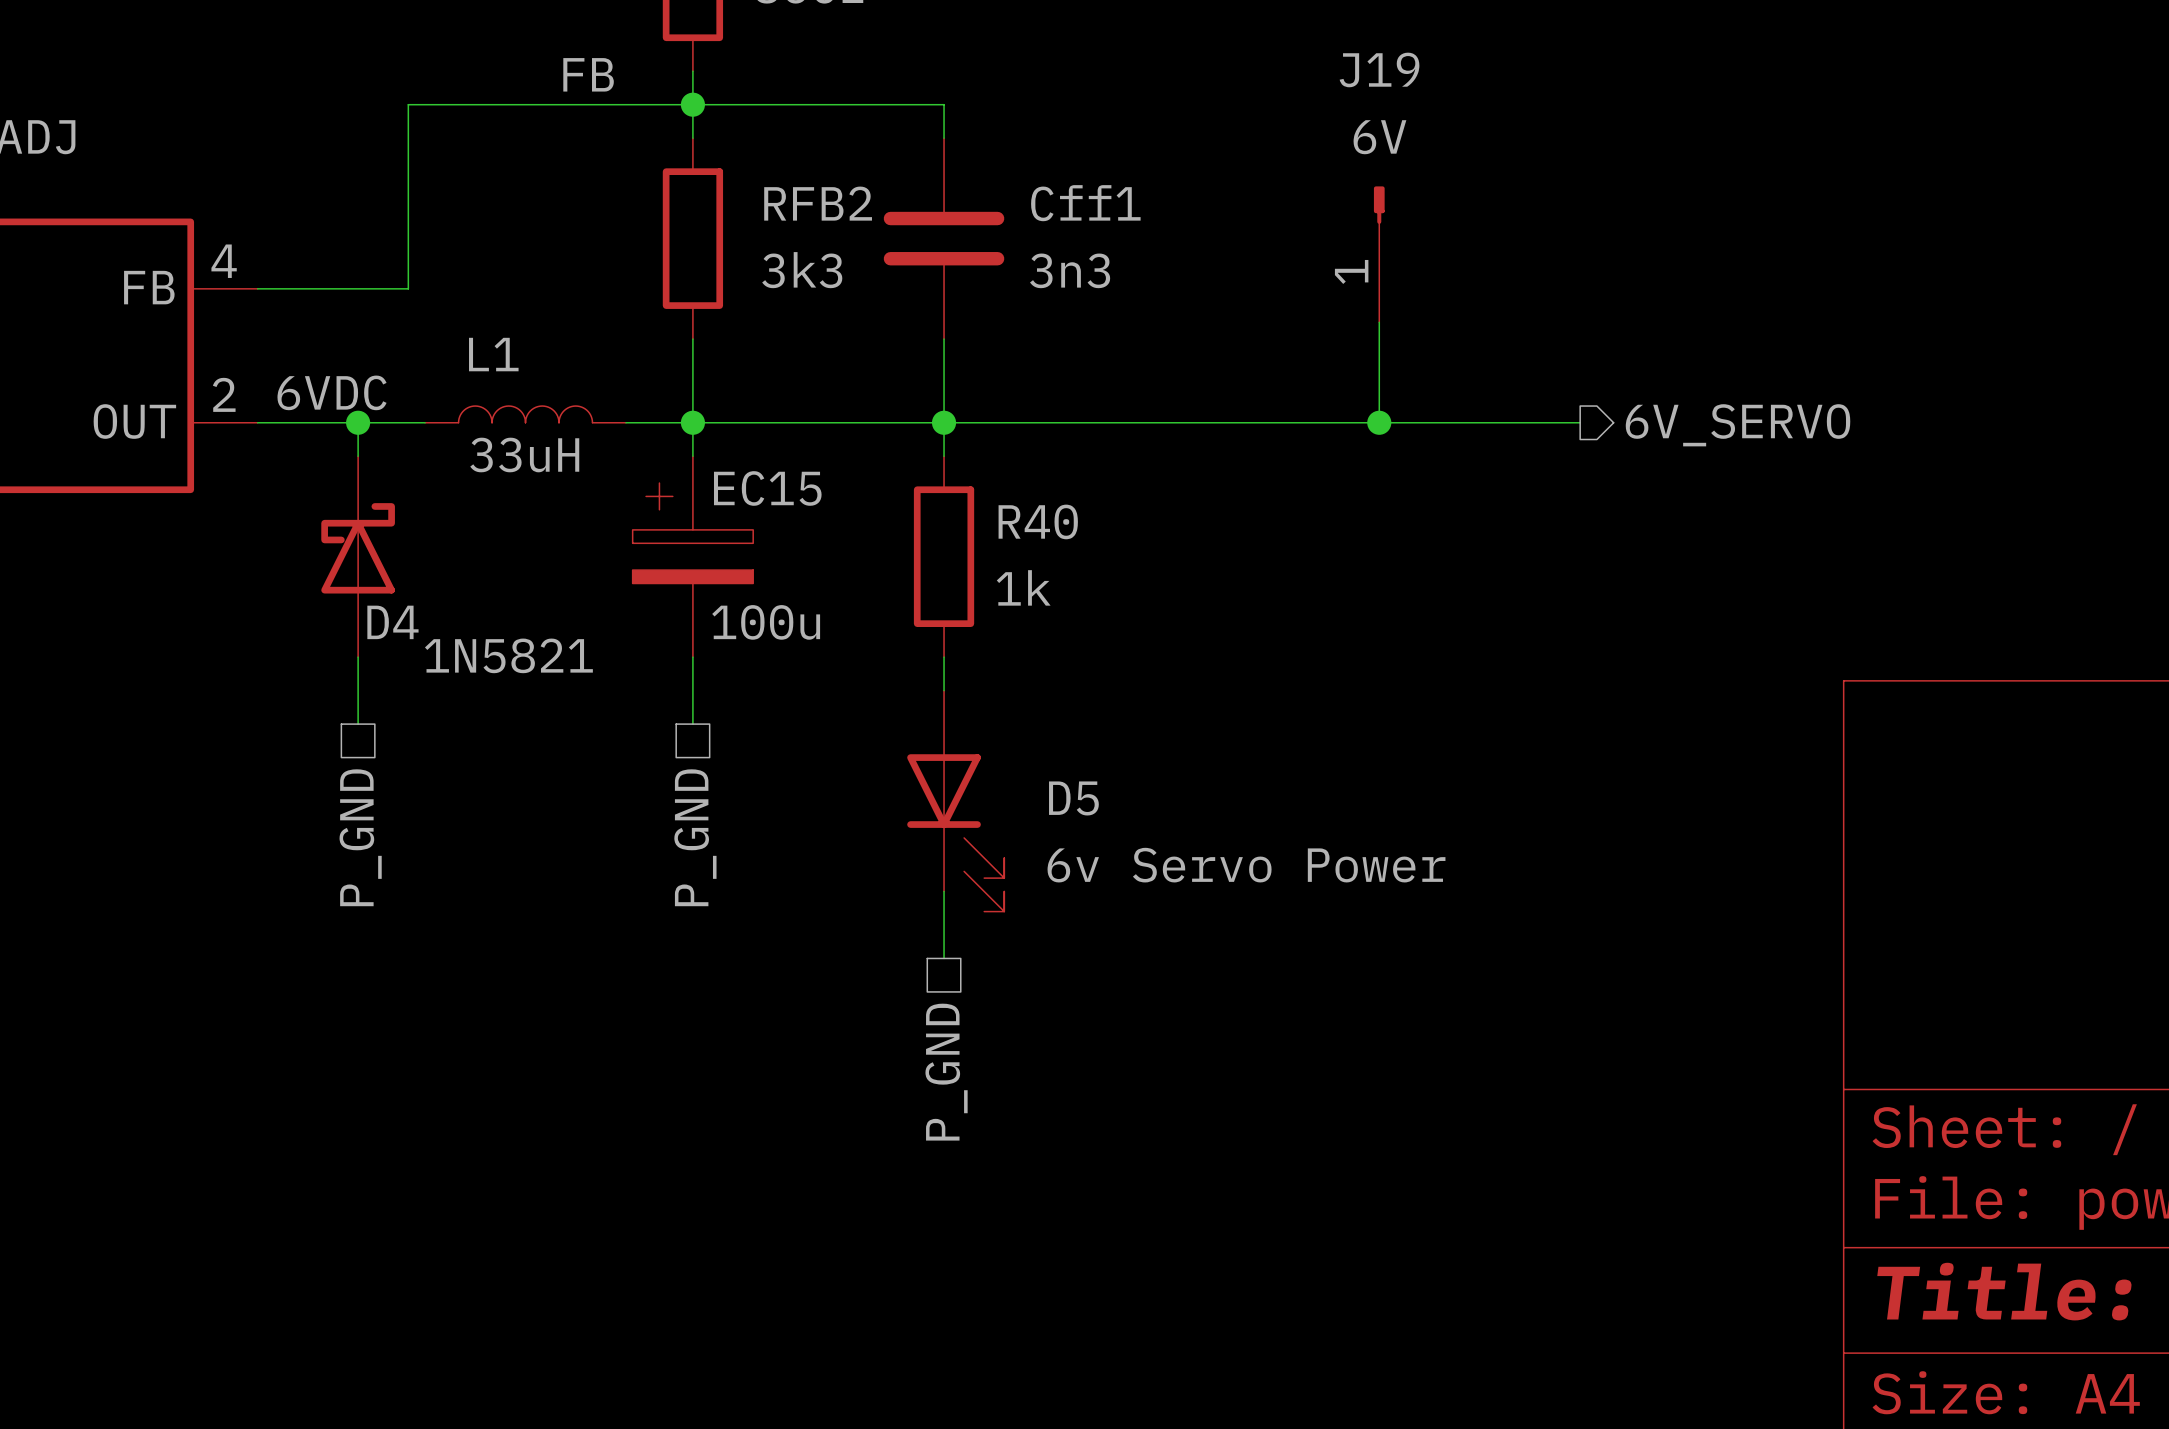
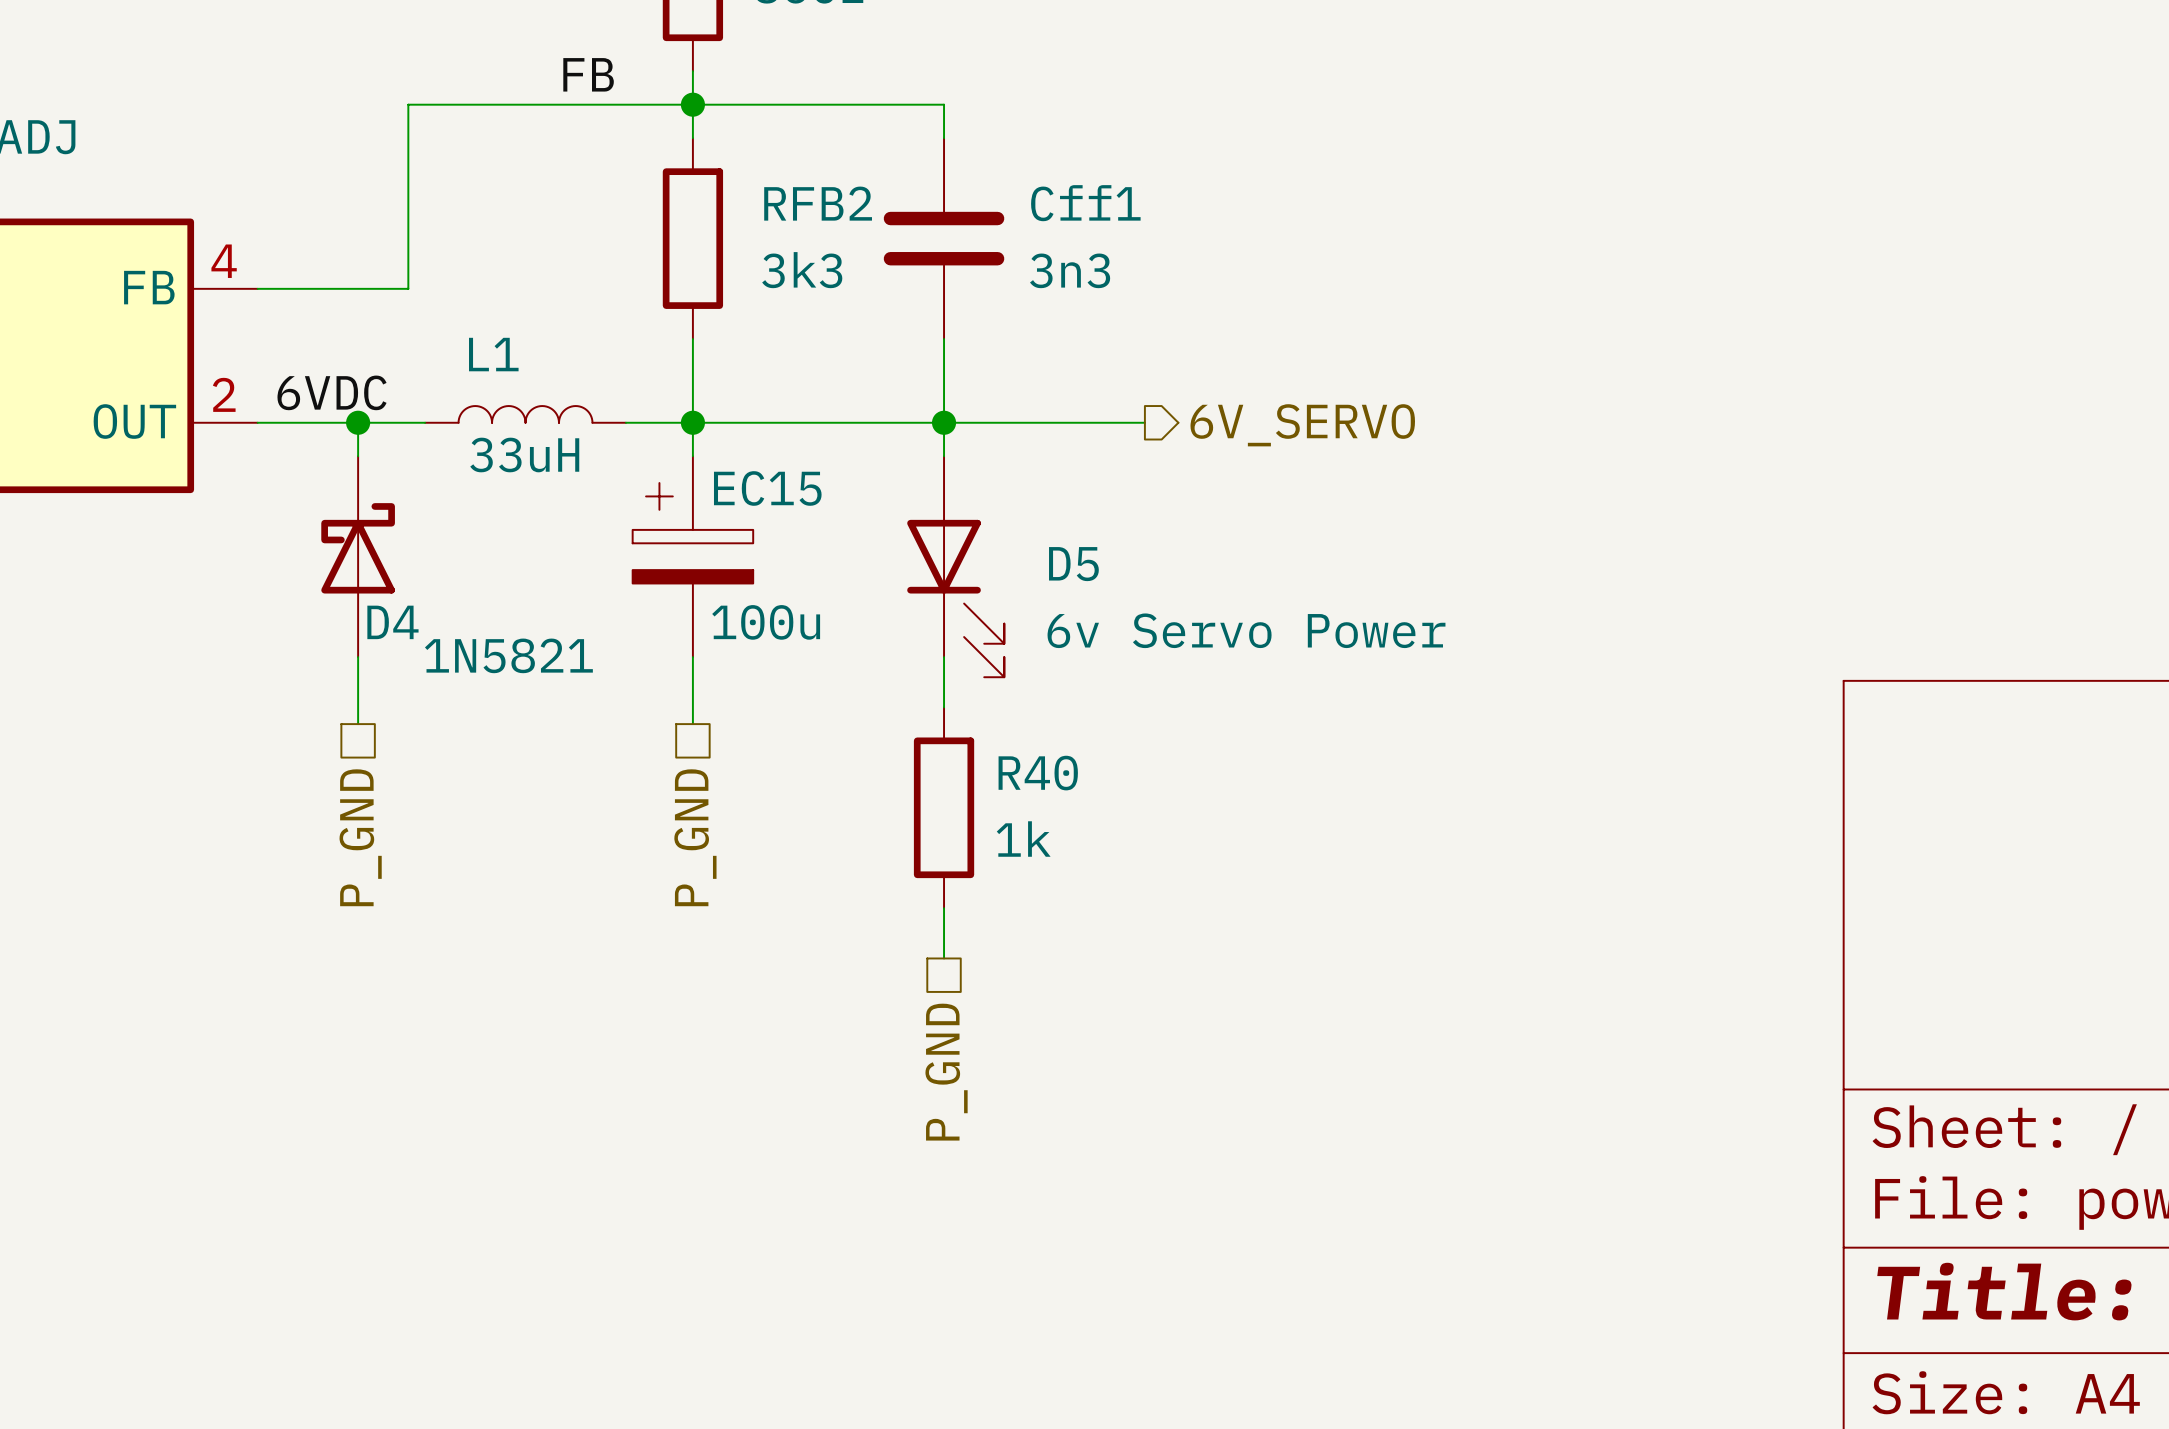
J19: 6V (1379, 254) -> none
wire: (1379, 322) (1379, 422) -> none
wire: (1144, 422) (1580, 422) -> none
junction: (1379, 422) -> none
hierarchical label position: 6V_SERVO (1738, 425) -> 6V_SERVO (1302, 425)
R40 position: (944, 556) -> (944, 807)
D5 position: (955, 801) -> (955, 566)

